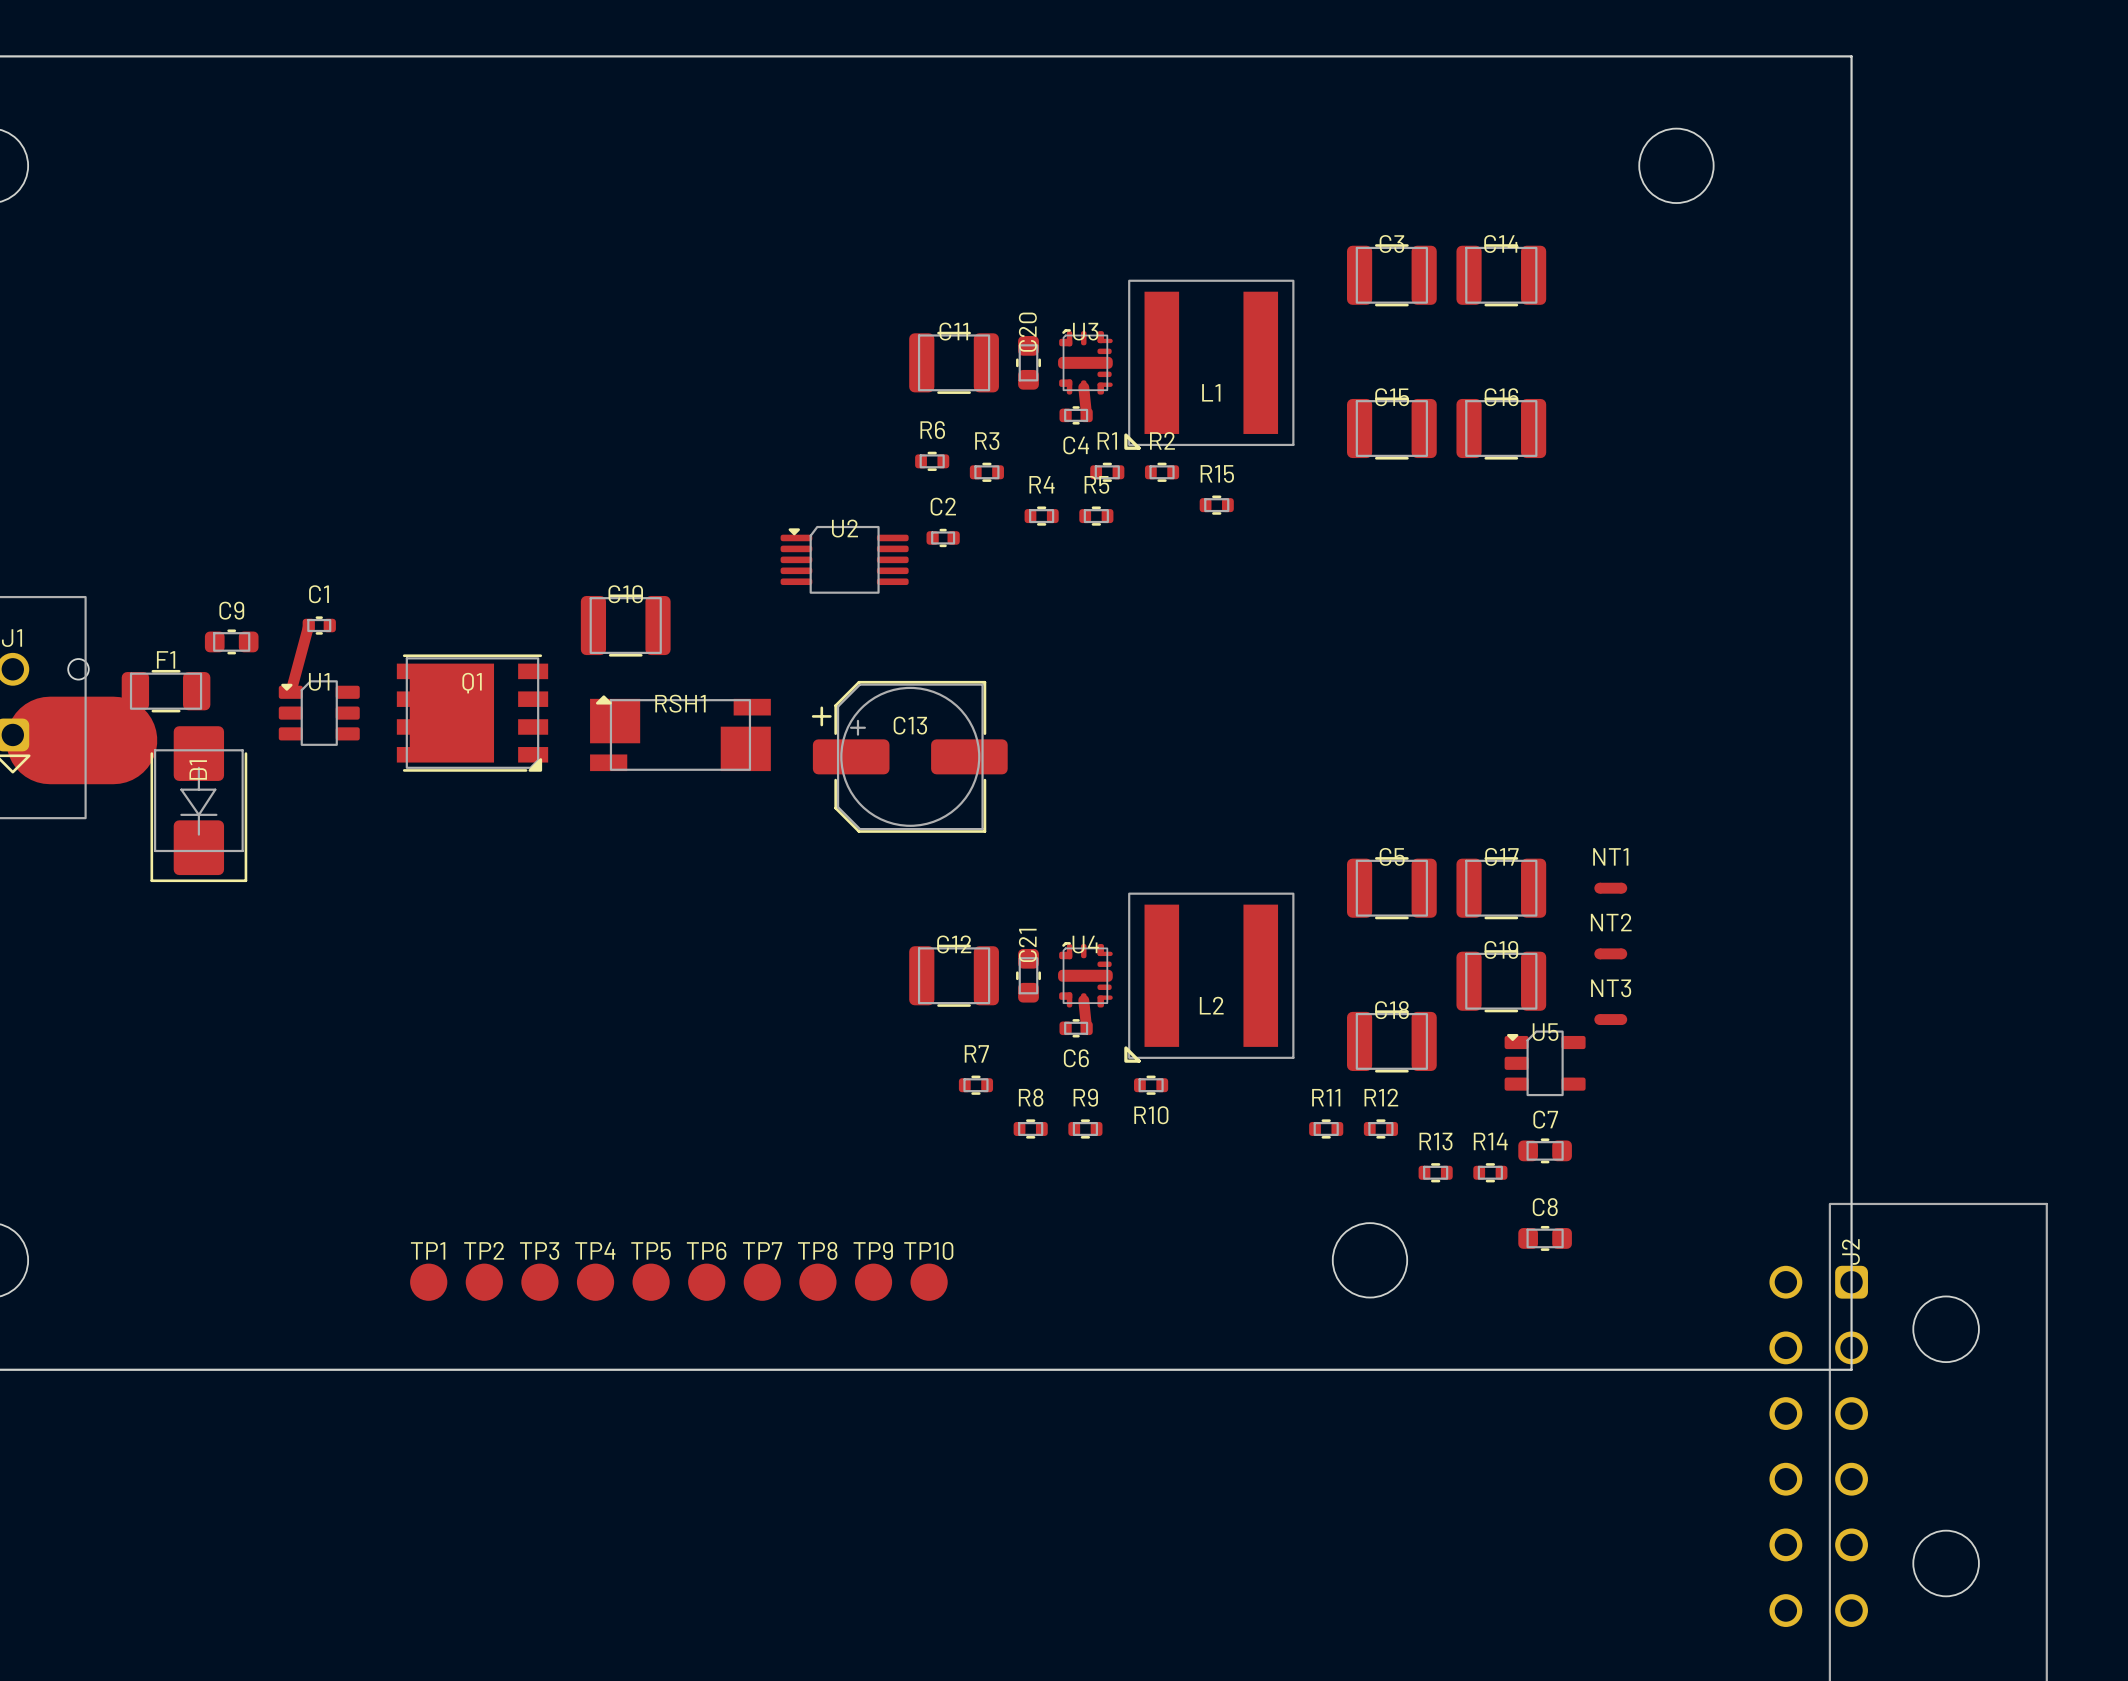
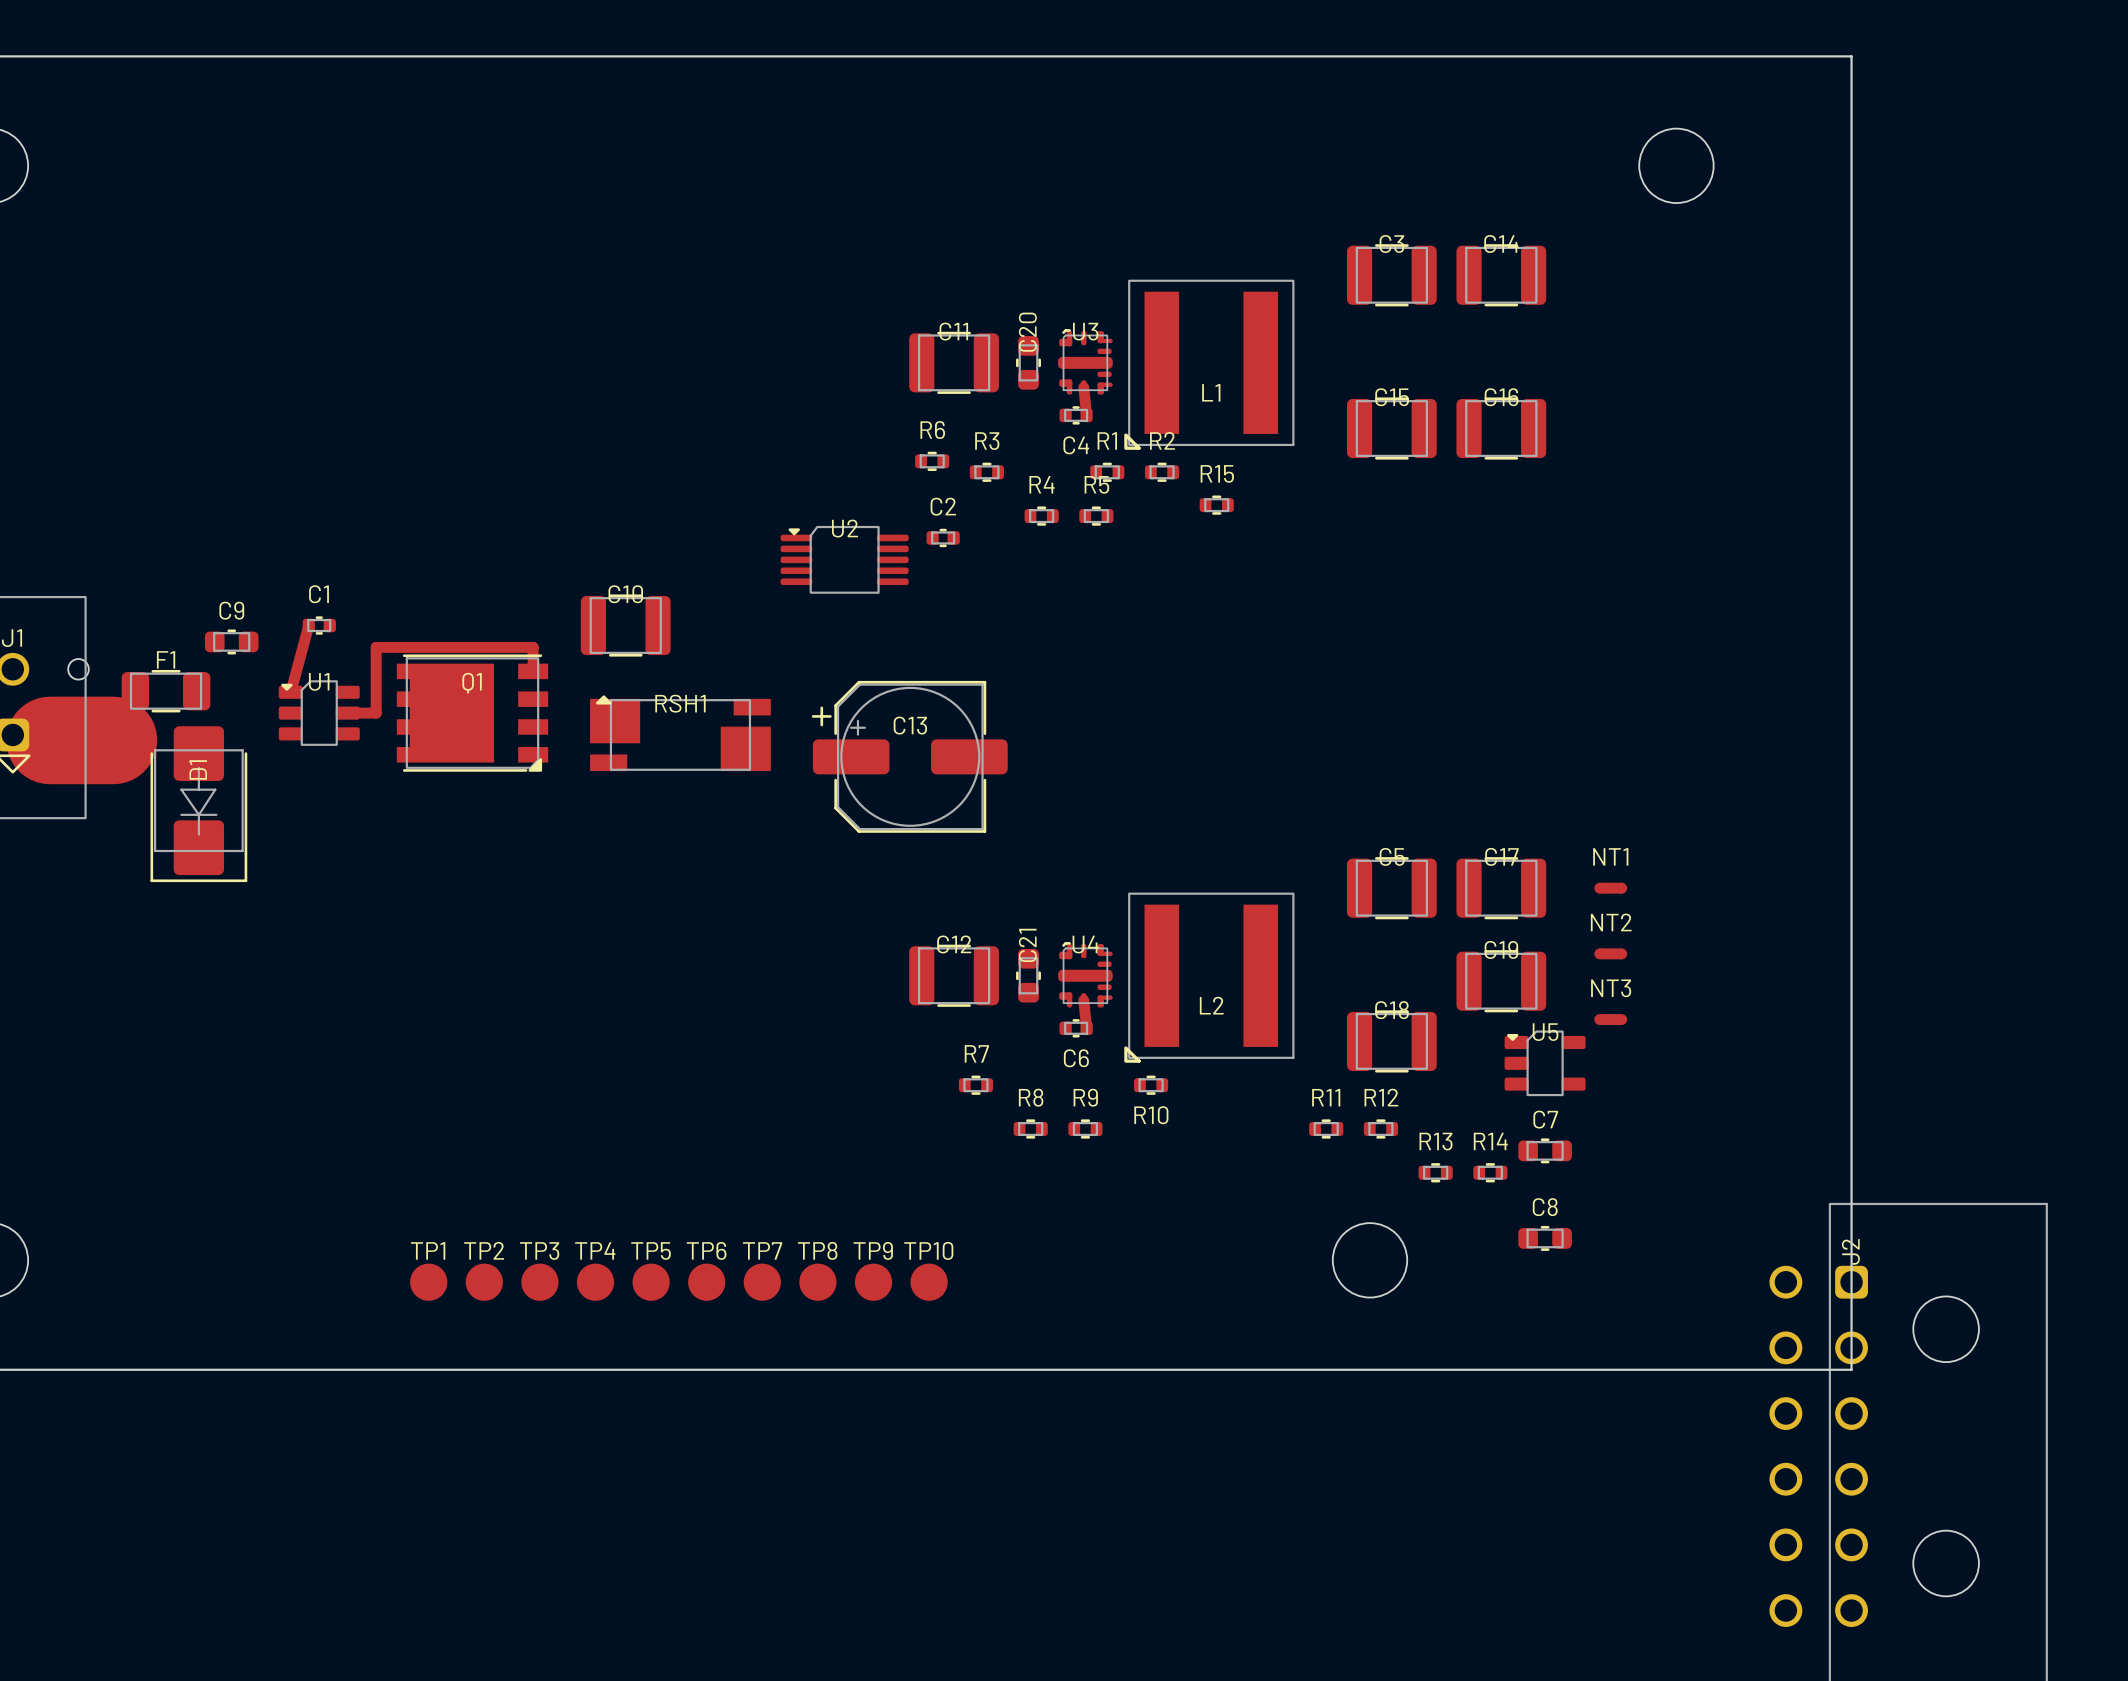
top track: none -> (533, 671) (533, 647) (376, 647) (376, 713) (347, 713)

